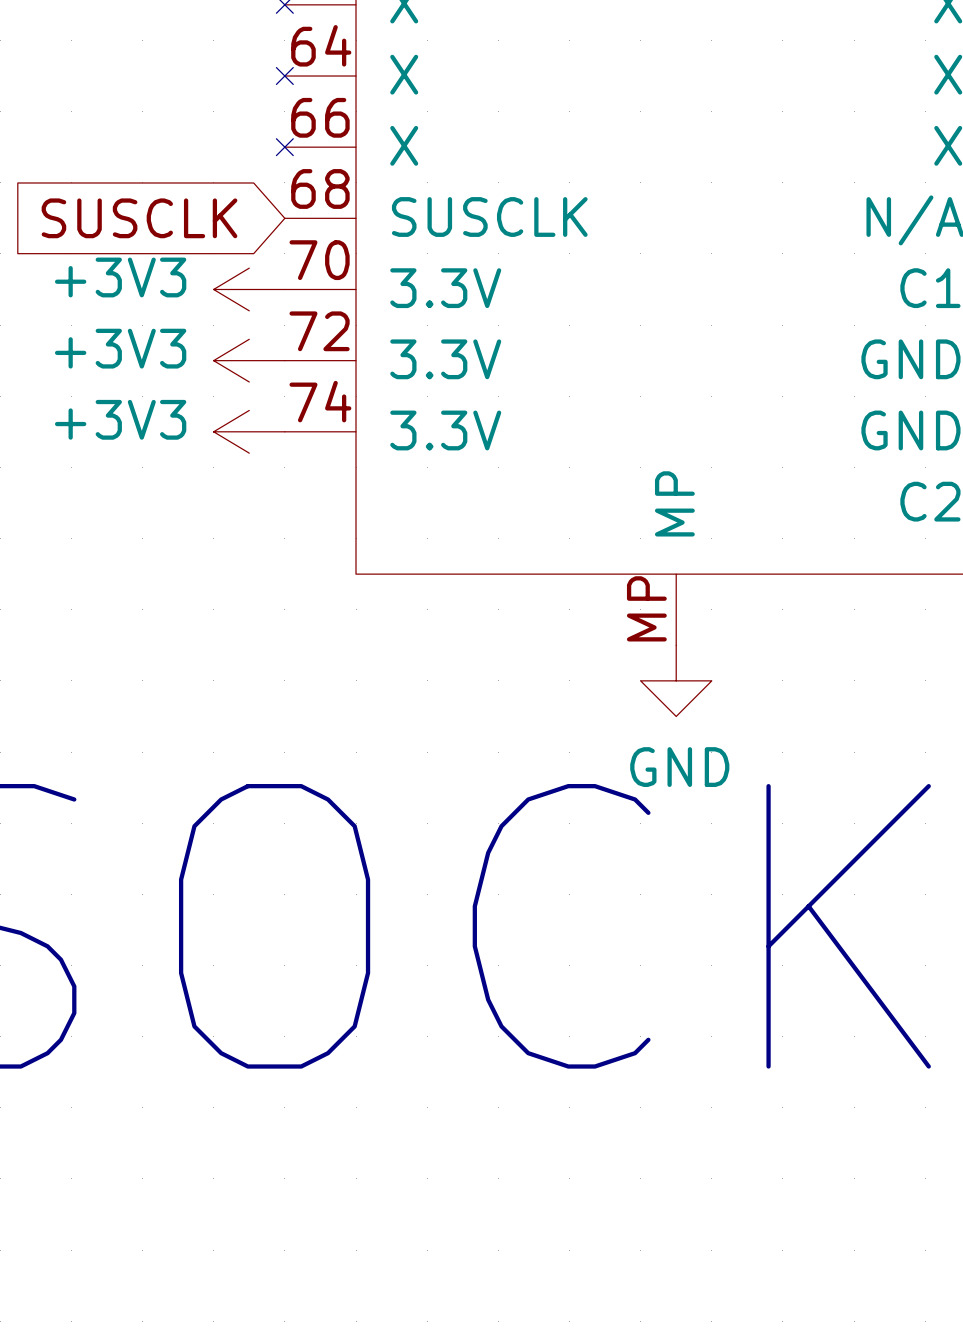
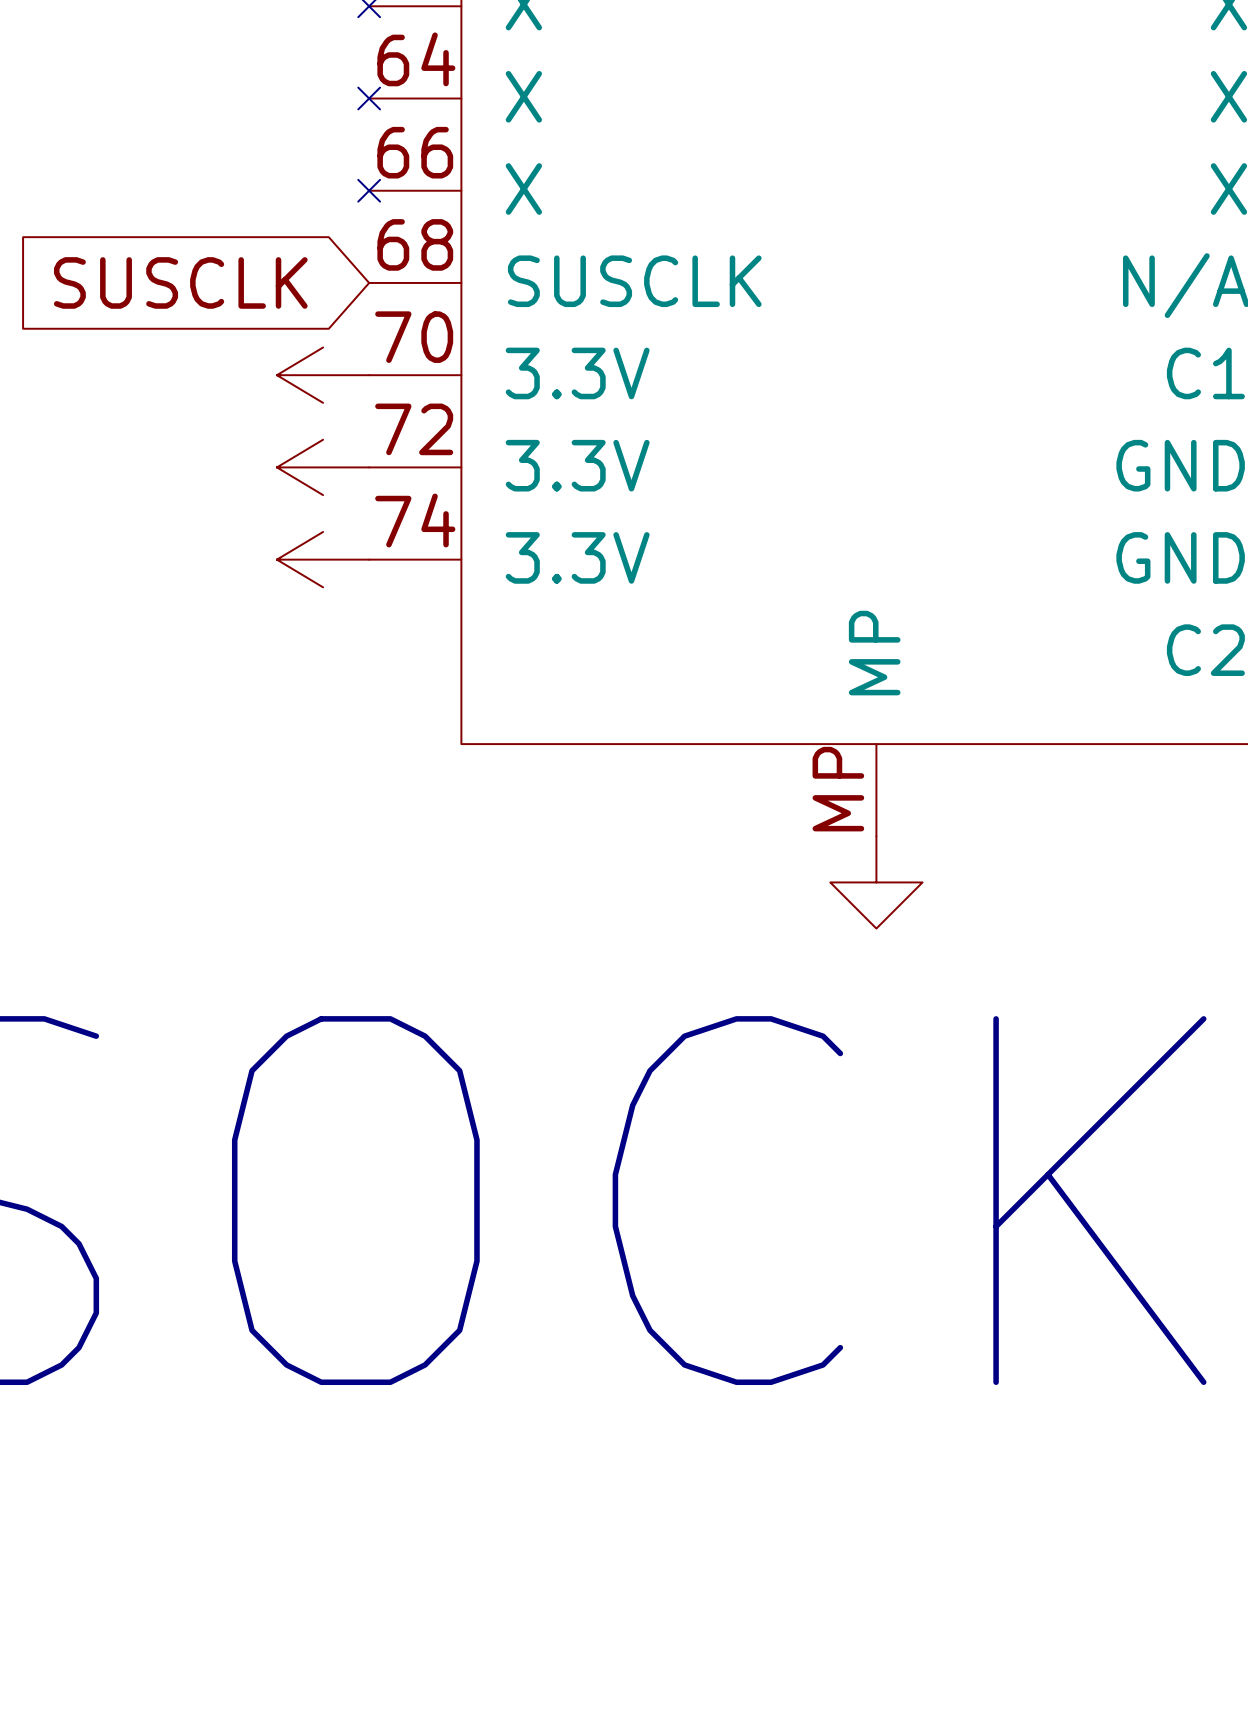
power symbol text: +3V3 (120, 277) -> none
power symbol text: +3V3 (120, 348) -> none
power symbol text: +3V3 (120, 419) -> none
power symbol text: GND (679, 767) -> none

